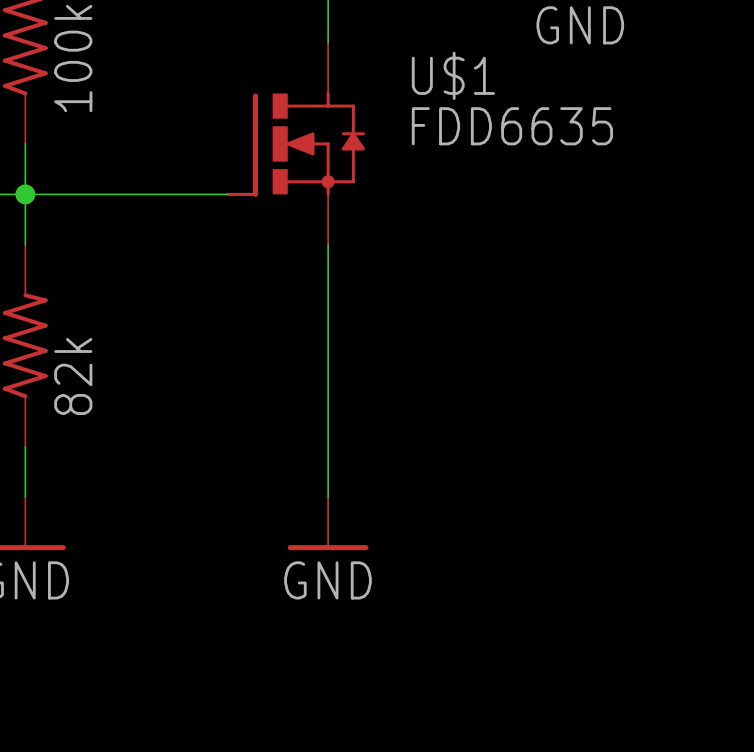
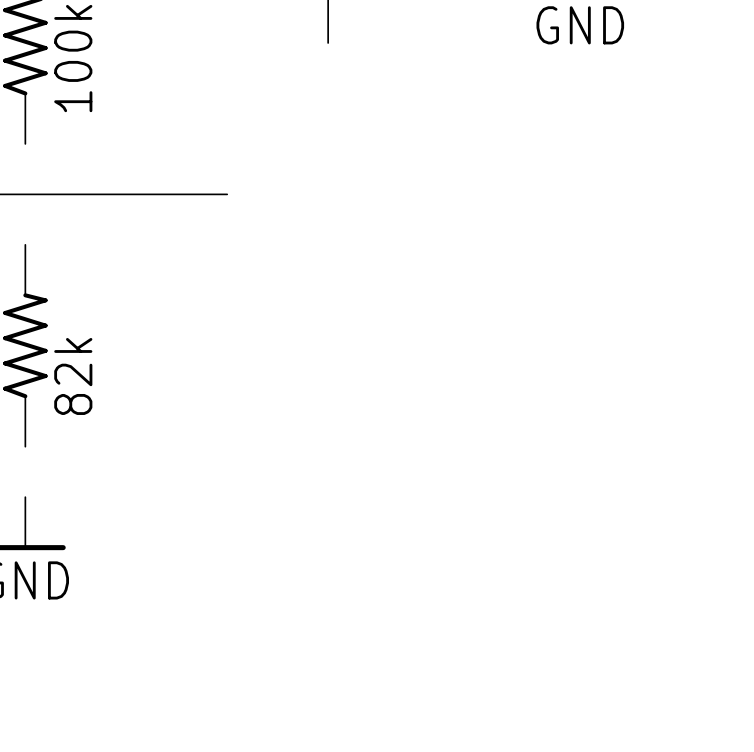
wire: (25, 143) (25, 244) -> none
U$1: FDD6635 (295, 143) -> none
junction: (25, 194) -> none
wire: (328, 244) (328, 497) -> none
wire: (25, 446) (25, 497) -> none
power symbol: GND (328, 523) -> none

